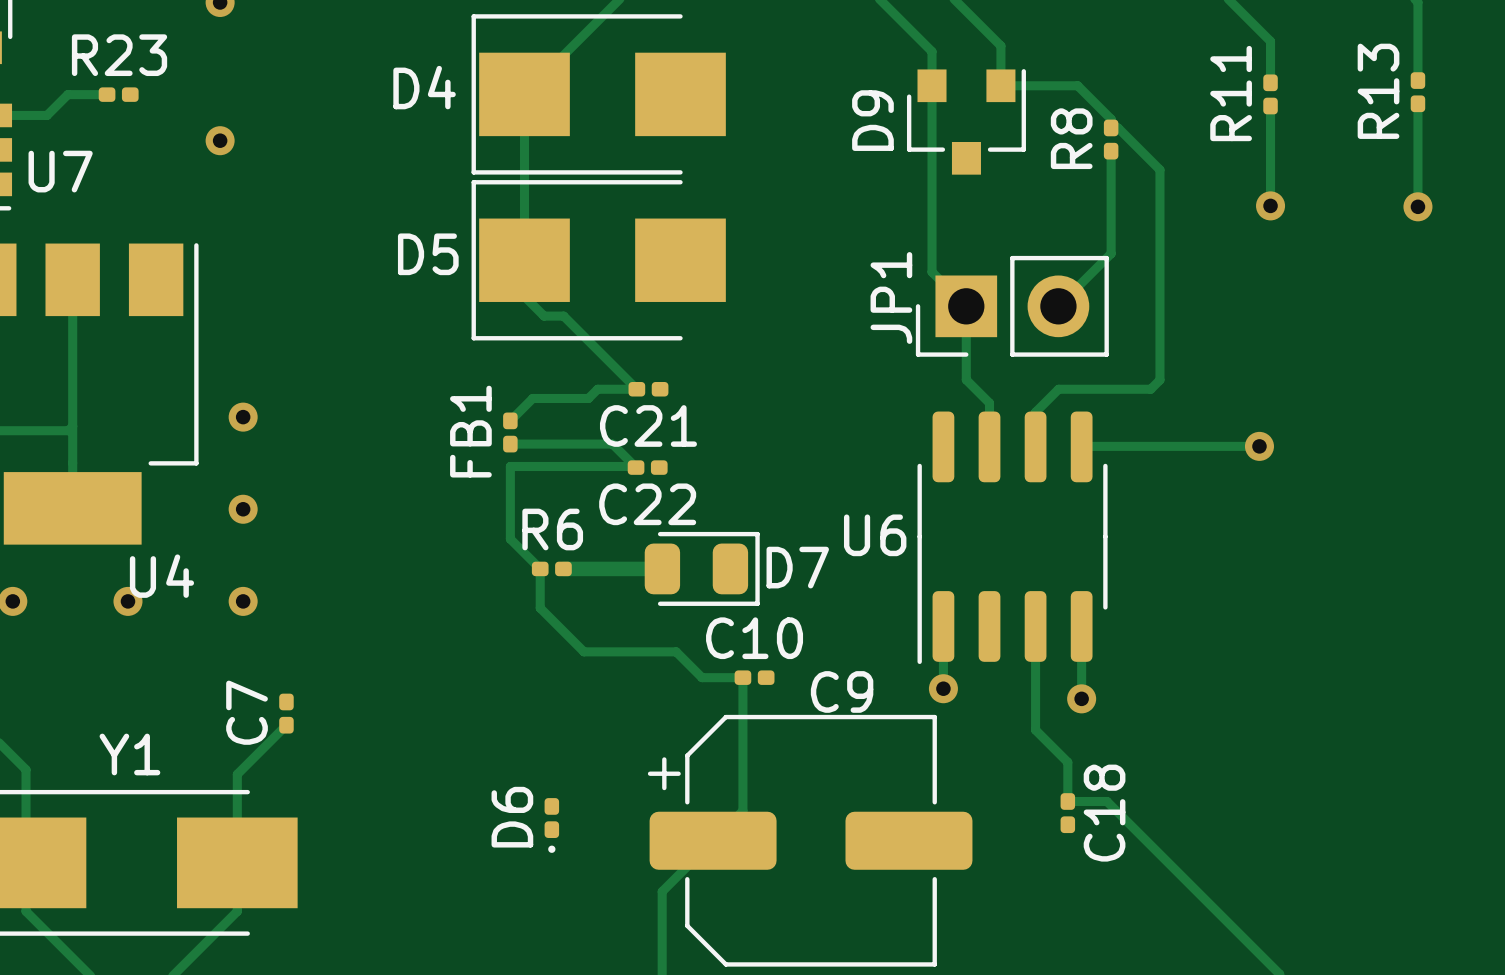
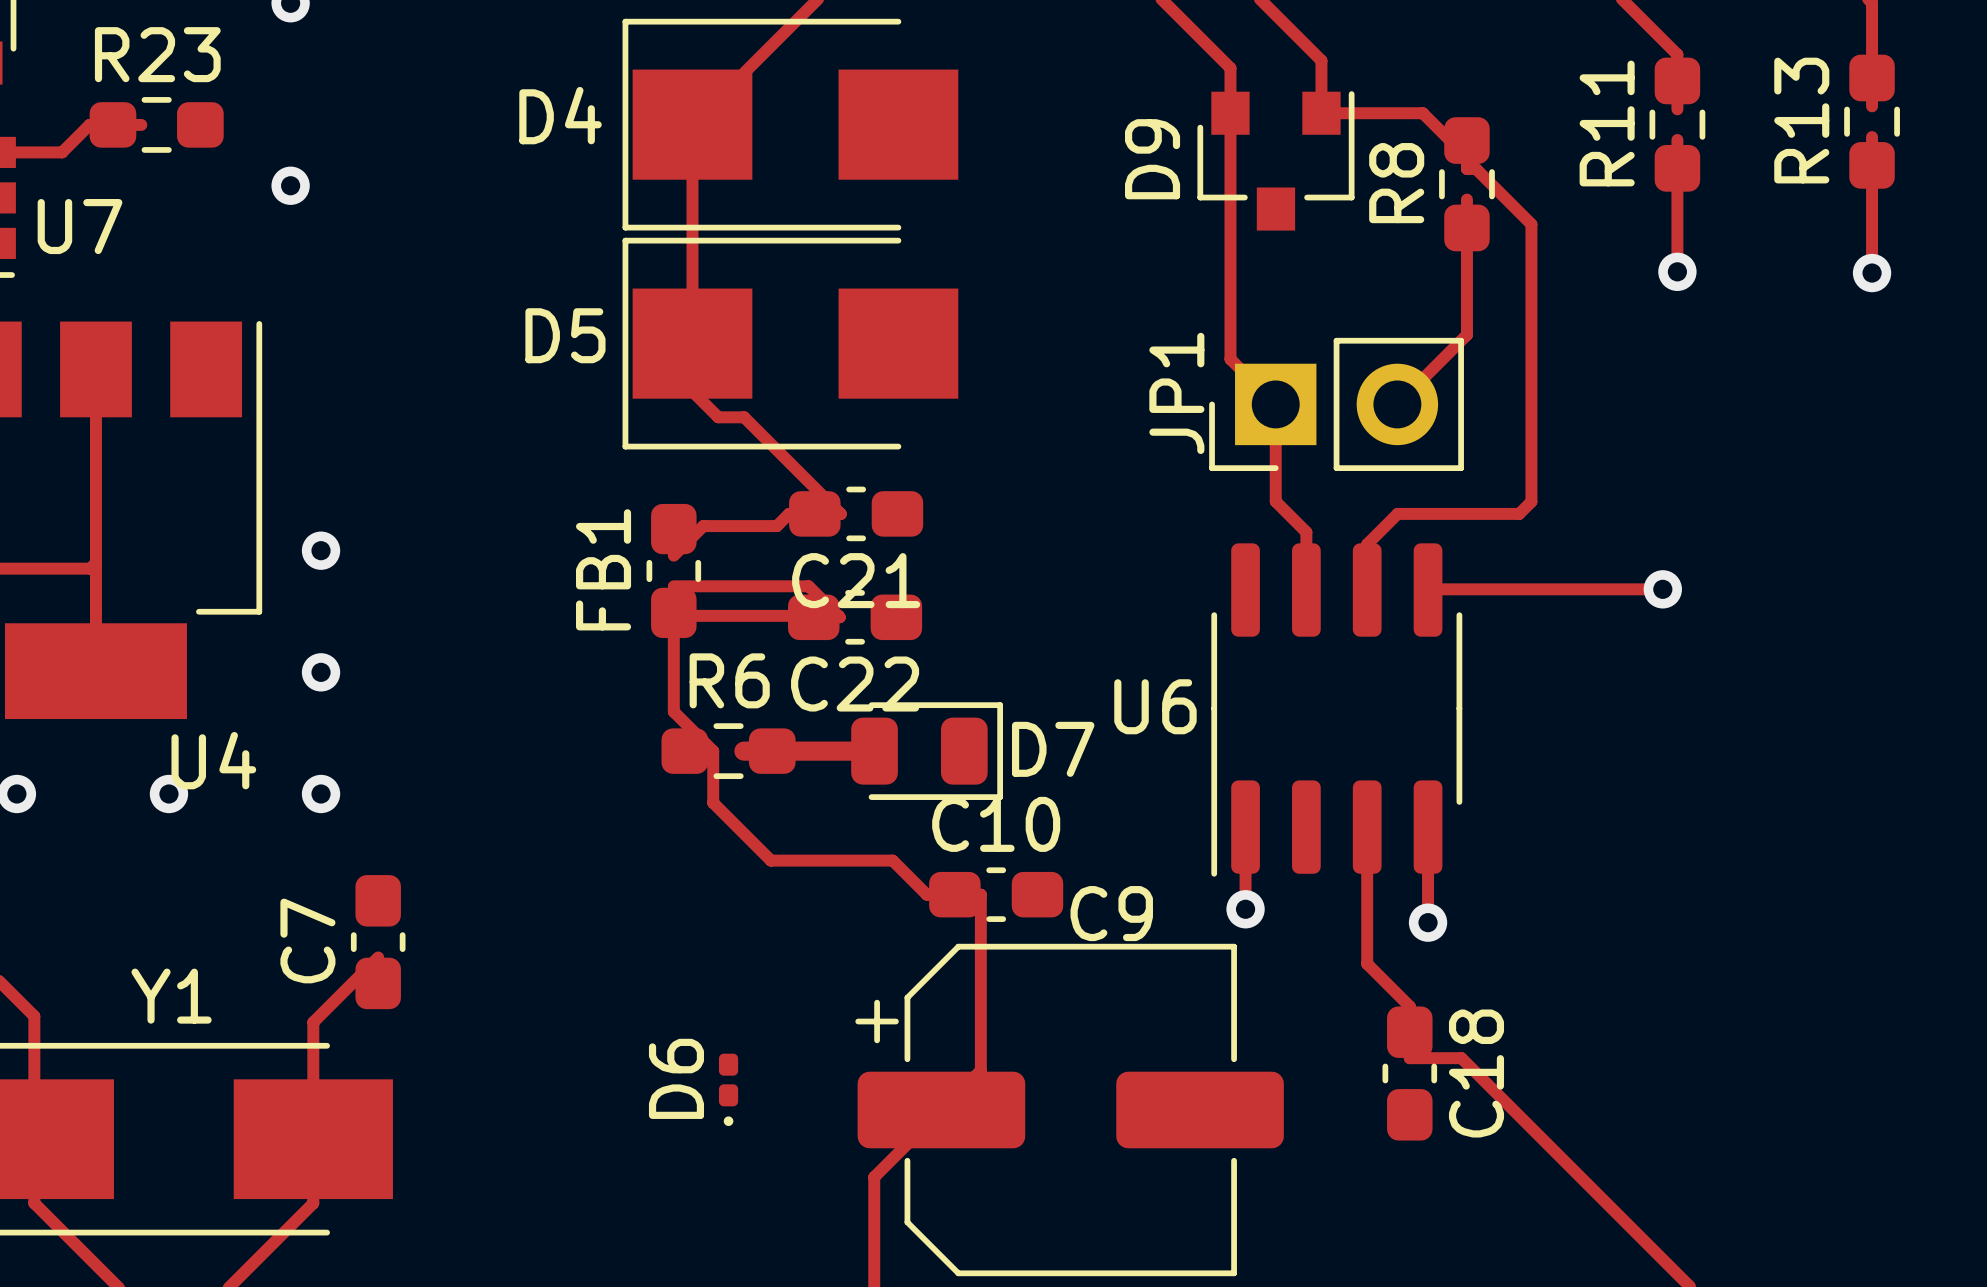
R13 footprint: [1410, 72, 1426, 113] -> [1844, 54, 1900, 189]
R11 footprint: [1263, 74, 1278, 115] -> [1649, 57, 1706, 192]
R23 footprint: [98, 87, 139, 102] -> [89, 97, 224, 153]
R8 footprint: [1103, 119, 1119, 160] -> [1439, 117, 1495, 252]
C21 footprint: [628, 382, 669, 397] -> [789, 486, 924, 542]
FB1 footprint: [503, 412, 518, 453] -> [646, 503, 702, 639]
C22 footprint: [627, 460, 668, 475] -> [788, 590, 923, 645]
R6 footprint: [531, 561, 572, 577] -> [661, 723, 796, 780]
C10 footprint: [734, 670, 775, 685] -> [929, 867, 1064, 922]
C7 footprint: [279, 693, 294, 734] -> [350, 875, 406, 1010]
C18 footprint: [1060, 793, 1076, 834] -> [1382, 1006, 1438, 1141]

